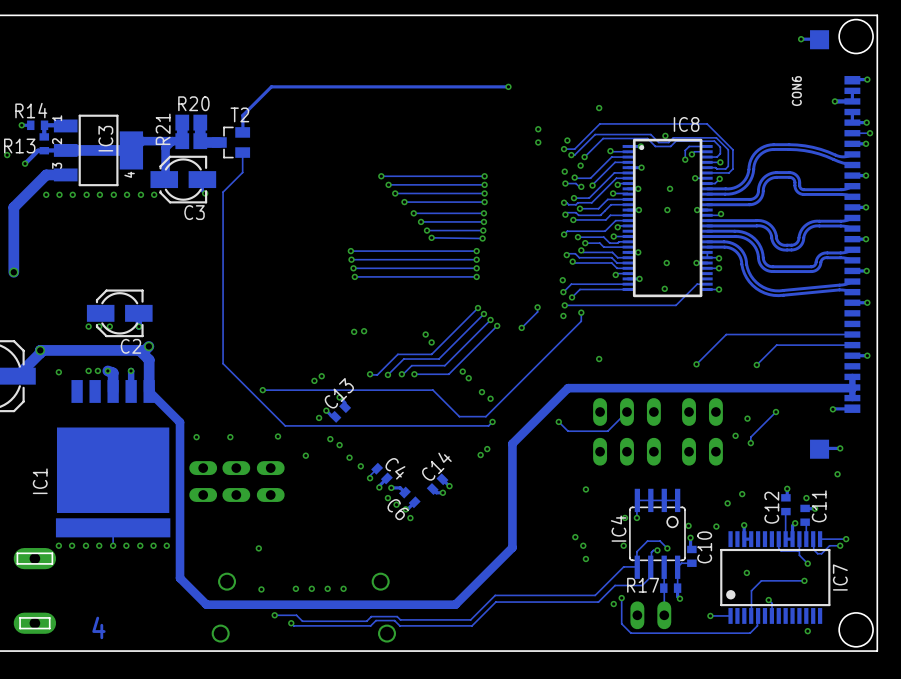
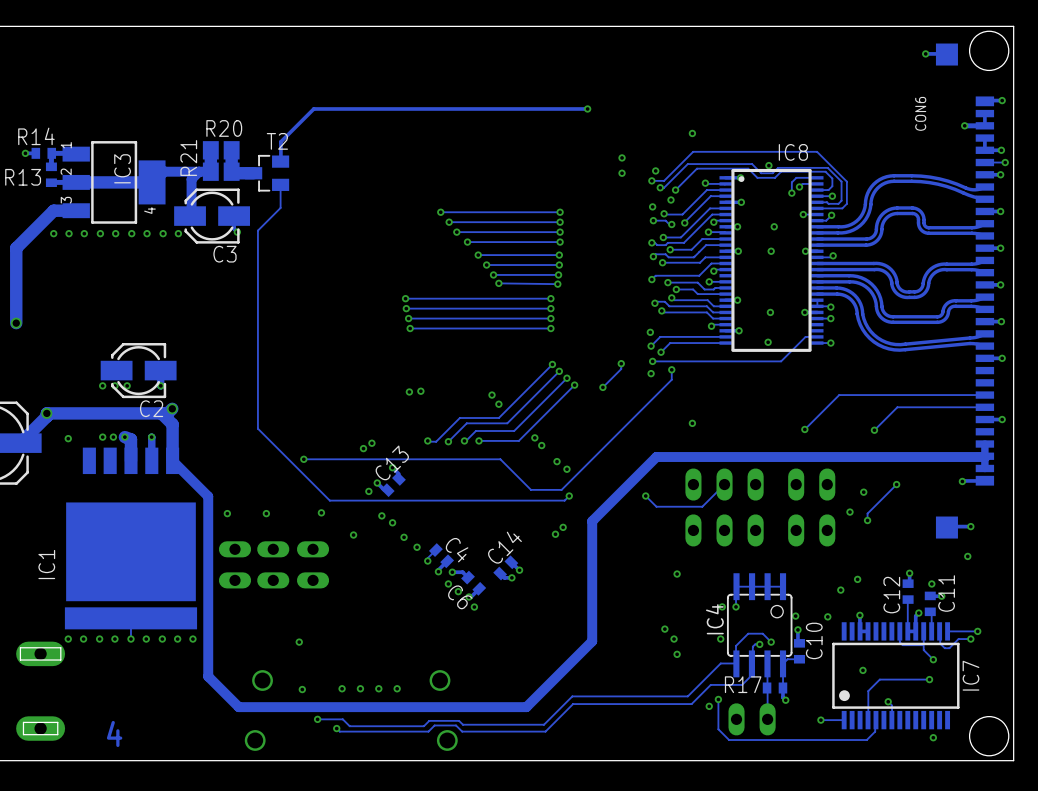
track: (44, 150) (38, 150) (25, 163) -> none
via: (7, 155) -> none
via: (25, 163) -> none

